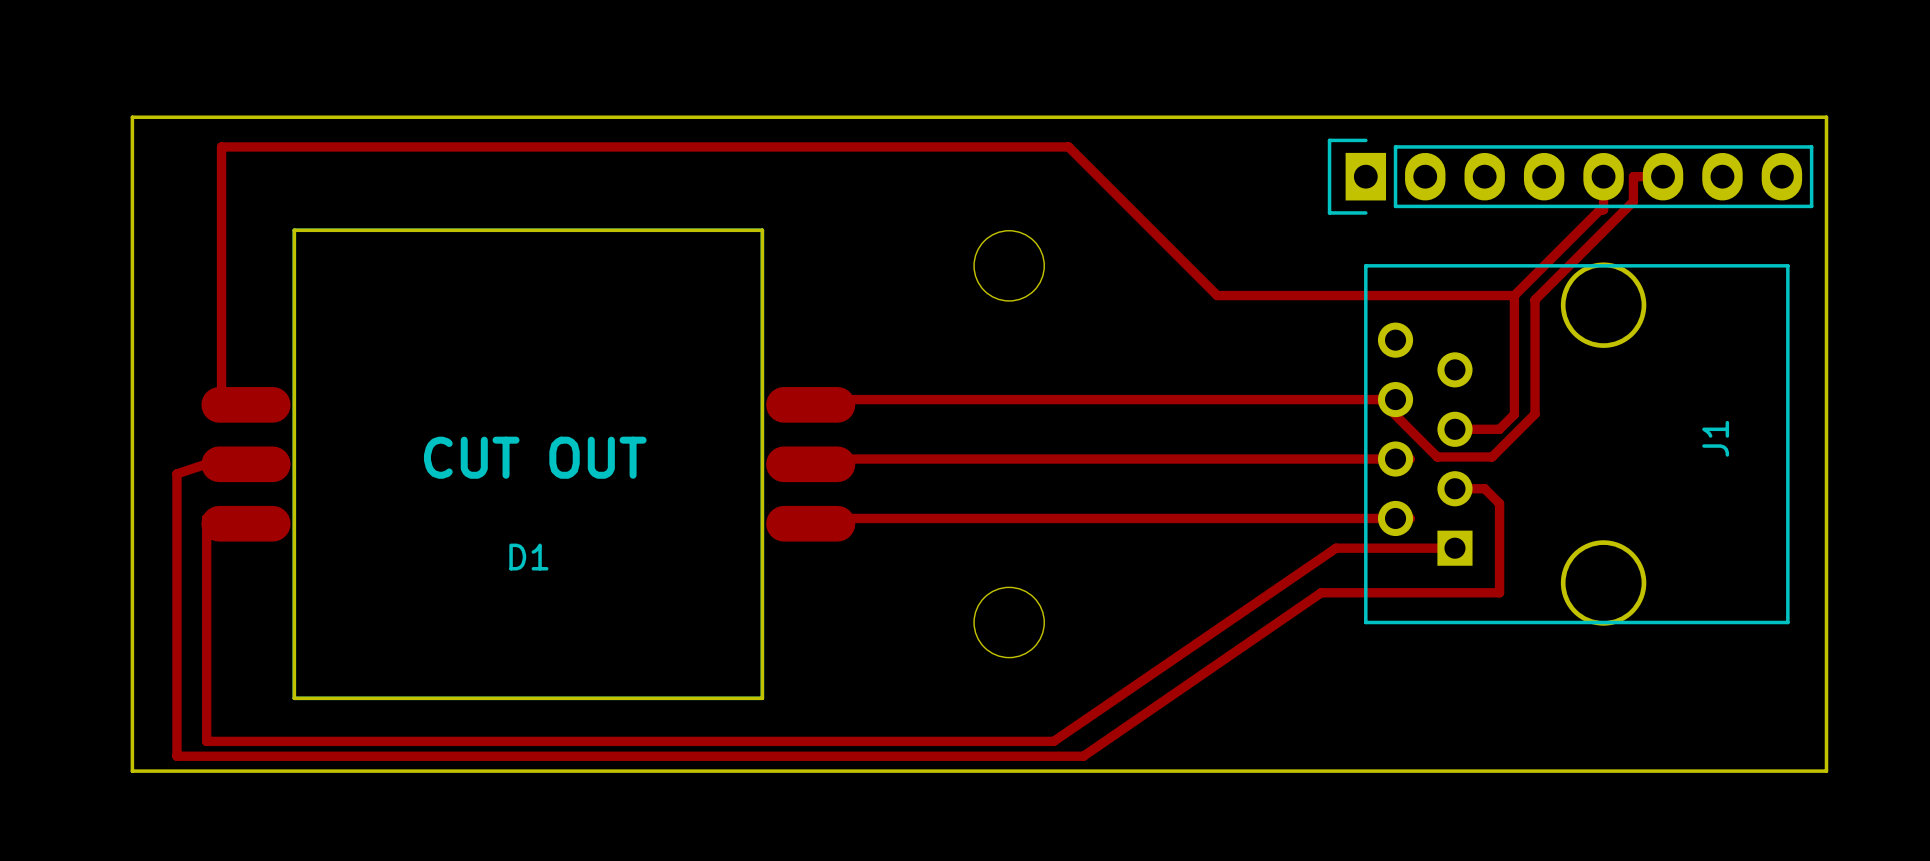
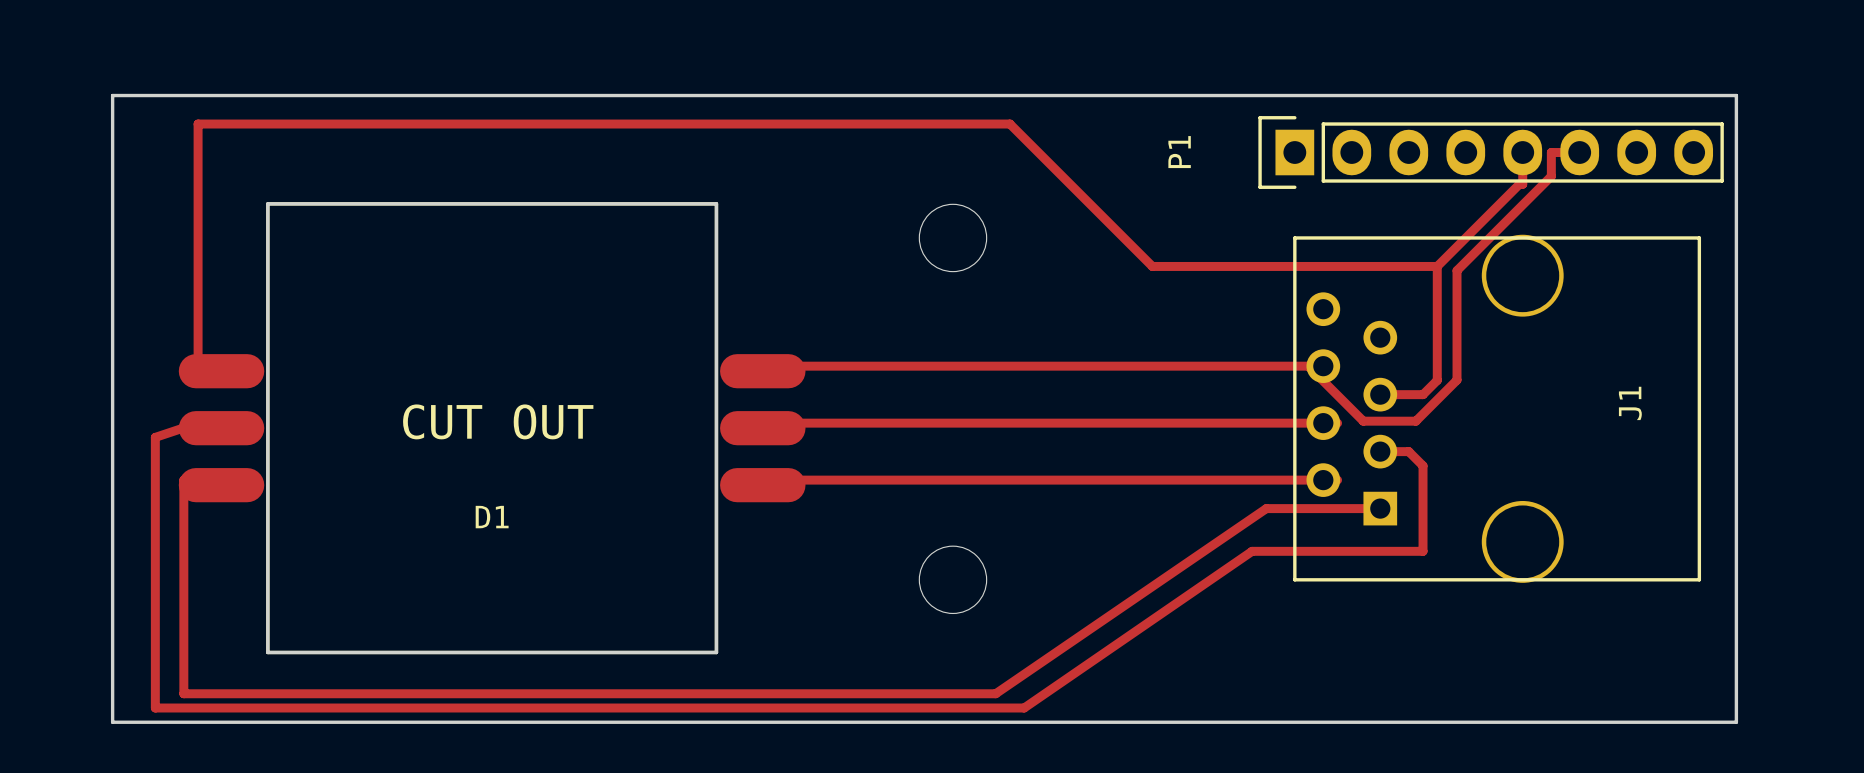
P1 name: none -> P1 (1179, 152)

